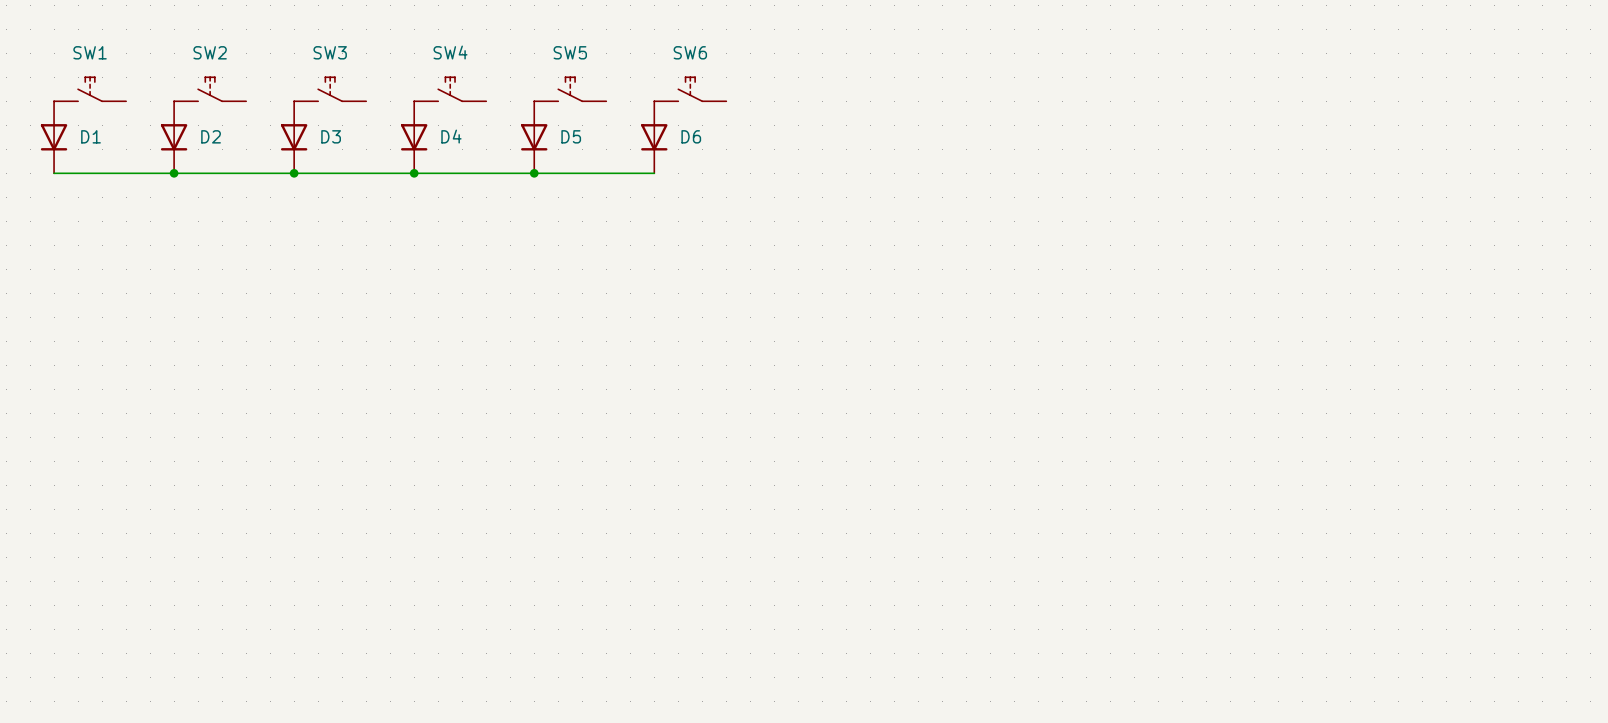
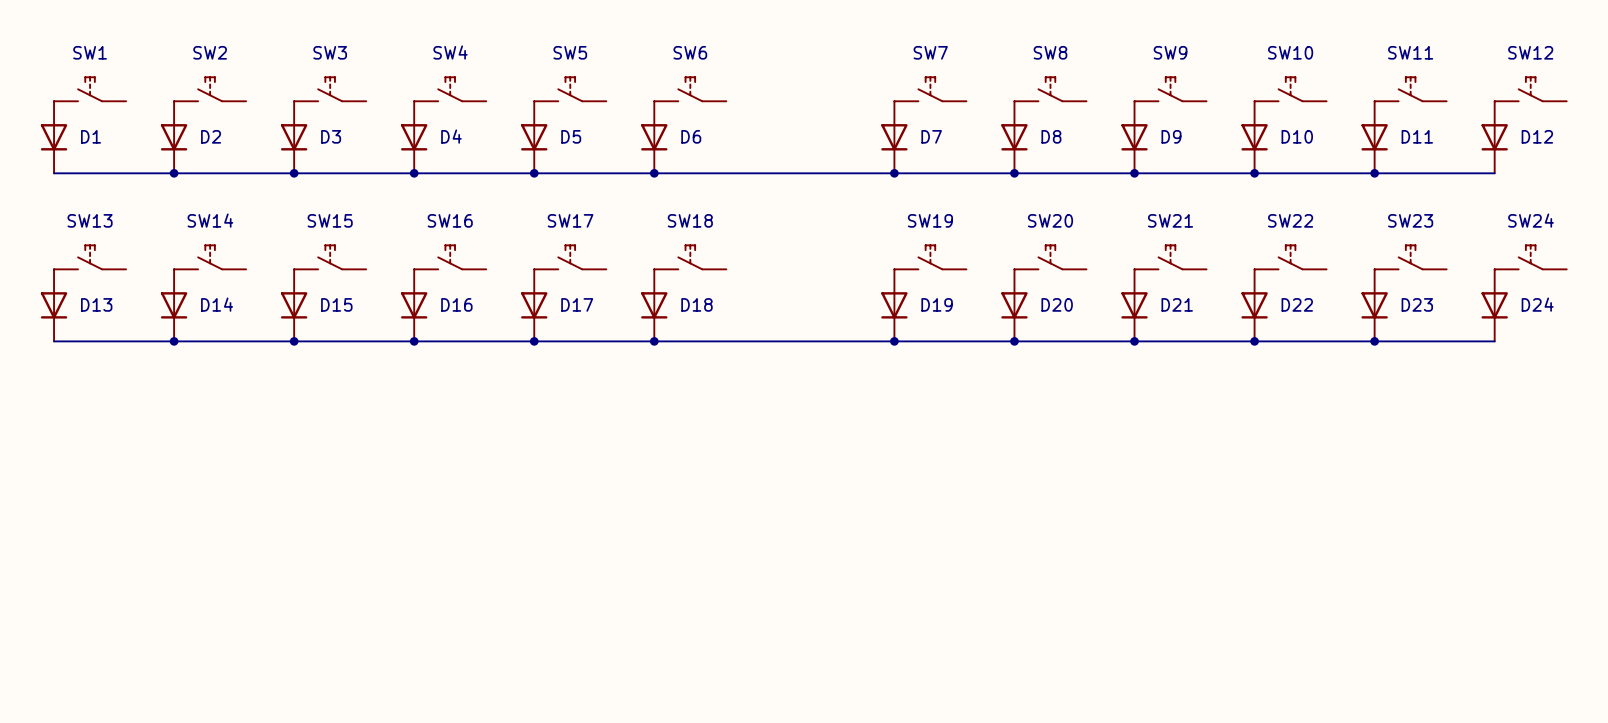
SW7: none -> (930, 89)
SW8: none -> (1050, 89)
SW9: none -> (1170, 89)
SW10: none -> (1290, 89)
SW11: none -> (1410, 89)
SW12: none -> (1530, 89)
D7: none -> (894, 137)
D8: none -> (1014, 137)
D9: none -> (1134, 137)
D10: none -> (1254, 137)
D11: none -> (1374, 137)
D12: none -> (1494, 137)
wire: none -> (654, 173) (1494, 173)
junction: none -> (654, 173)
junction: none -> (894, 173)
junction: none -> (1014, 173)
junction: none -> (1134, 173)
junction: none -> (1254, 173)
junction: none -> (1374, 173)
SW13: none -> (90, 257)
SW14: none -> (210, 257)
SW15: none -> (330, 257)
SW16: none -> (450, 257)
SW17: none -> (570, 257)
SW18: none -> (690, 257)
SW19: none -> (930, 257)
SW20: none -> (1050, 257)
SW21: none -> (1170, 257)
SW22: none -> (1290, 257)
SW23: none -> (1410, 257)
SW24: none -> (1530, 257)
D13: none -> (54, 305)
D14: none -> (174, 305)
D15: none -> (294, 305)
D16: none -> (414, 305)
D17: none -> (534, 305)
D18: none -> (654, 305)
D19: none -> (894, 305)
D20: none -> (1014, 305)
D21: none -> (1134, 305)
D22: none -> (1254, 305)
D23: none -> (1374, 305)
D24: none -> (1494, 305)
wire: none -> (54, 341) (1494, 341)
junction: none -> (174, 341)
junction: none -> (294, 341)
junction: none -> (414, 341)
junction: none -> (534, 341)
junction: none -> (654, 341)
junction: none -> (894, 341)
junction: none -> (1014, 341)
junction: none -> (1134, 341)
junction: none -> (1254, 341)
junction: none -> (1374, 341)

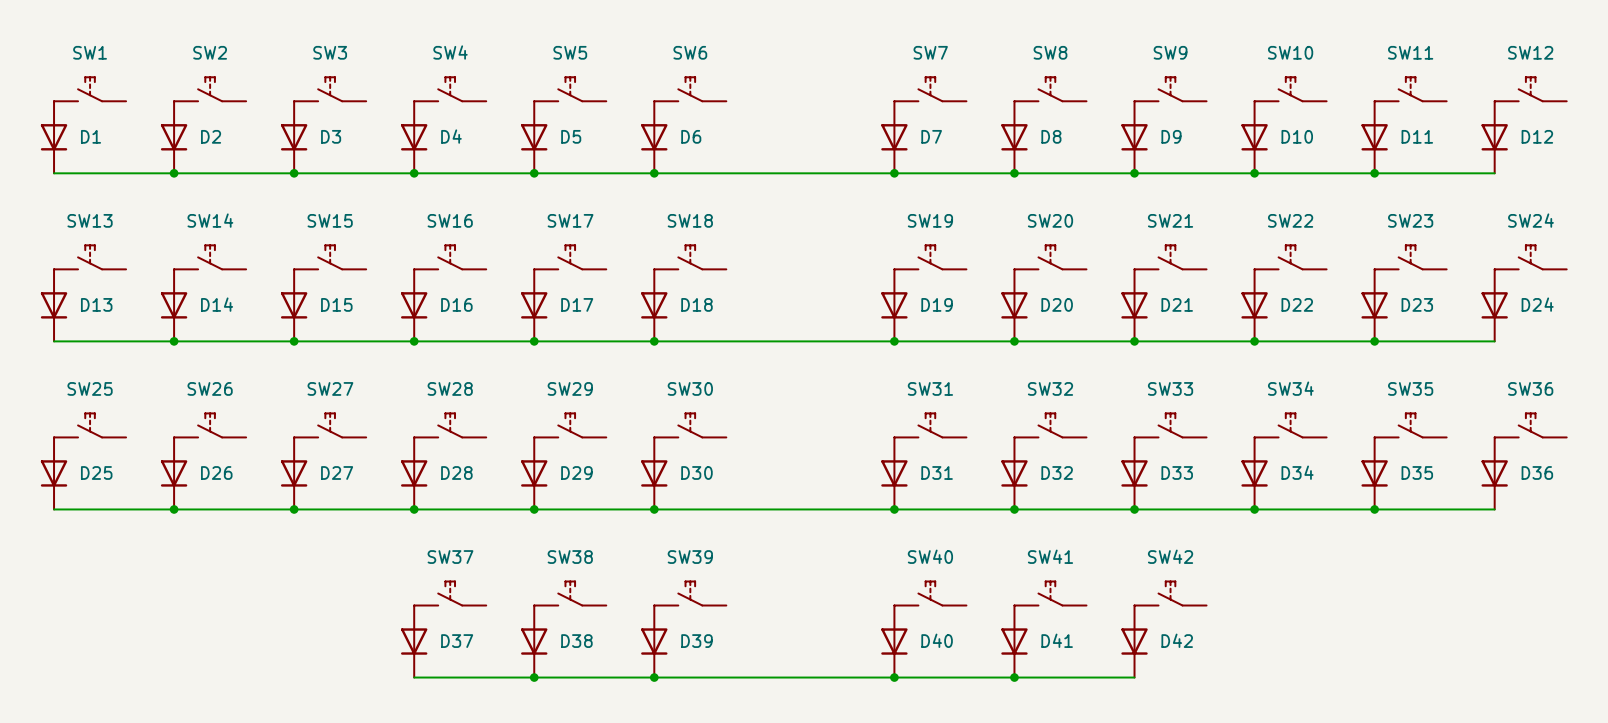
SW25: none -> (90, 425)
SW26: none -> (210, 425)
SW27: none -> (330, 425)
SW28: none -> (450, 425)
SW29: none -> (570, 425)
SW30: none -> (690, 425)
SW31: none -> (930, 425)
SW32: none -> (1050, 425)
SW33: none -> (1170, 425)
SW34: none -> (1290, 425)
SW35: none -> (1410, 425)
SW36: none -> (1530, 425)
D25: none -> (54, 473)
D26: none -> (174, 473)
D27: none -> (294, 473)
D28: none -> (414, 473)
D29: none -> (534, 473)
D30: none -> (654, 473)
D31: none -> (894, 473)
D32: none -> (1014, 473)
D33: none -> (1134, 473)
D34: none -> (1254, 473)
D35: none -> (1374, 473)
D36: none -> (1494, 473)
wire: none -> (54, 509) (1494, 509)
junction: none -> (174, 509)
junction: none -> (294, 509)
junction: none -> (414, 509)
junction: none -> (534, 509)
junction: none -> (654, 509)
junction: none -> (894, 509)
junction: none -> (1014, 509)
junction: none -> (1134, 509)
junction: none -> (1254, 509)
junction: none -> (1374, 509)
SW37: none -> (450, 593)
SW38: none -> (570, 593)
SW39: none -> (690, 593)
SW40: none -> (930, 593)
SW41: none -> (1050, 593)
SW42: none -> (1170, 593)
D37: none -> (414, 641)
D38: none -> (534, 641)
D39: none -> (654, 641)
D40: none -> (894, 641)
D41: none -> (1014, 641)
D42: none -> (1134, 641)
wire: none -> (414, 677) (1134, 677)
junction: none -> (534, 677)
junction: none -> (654, 677)
junction: none -> (894, 677)
junction: none -> (1014, 677)

